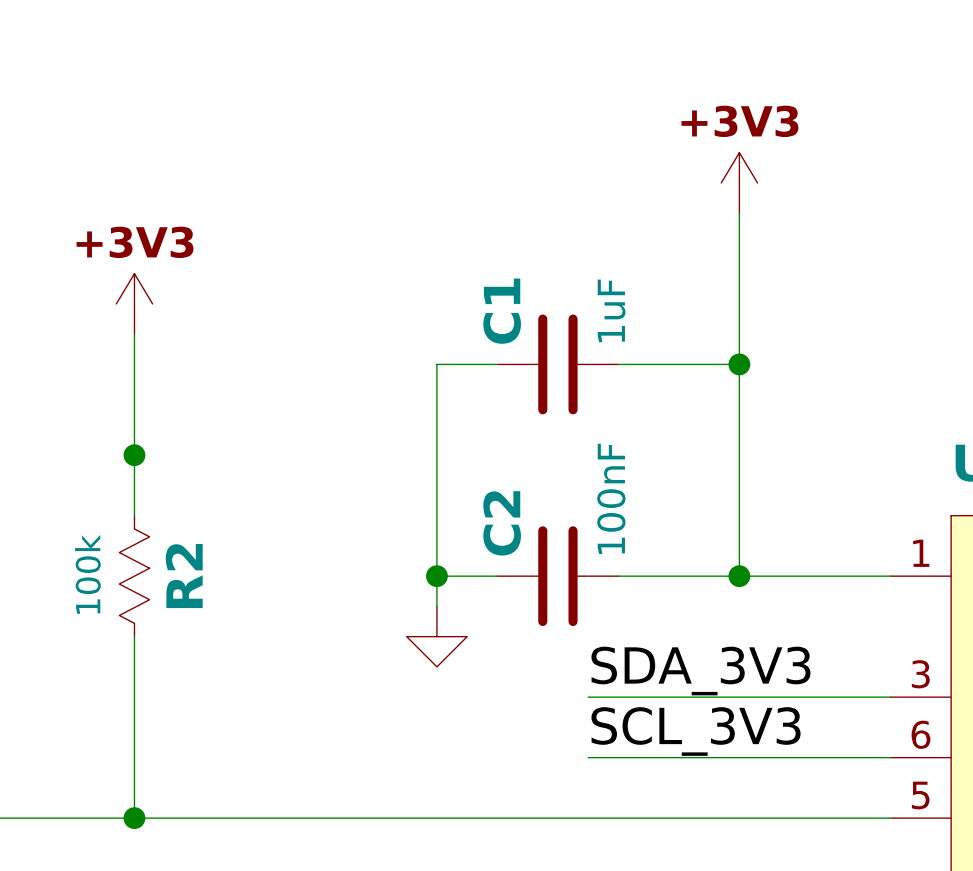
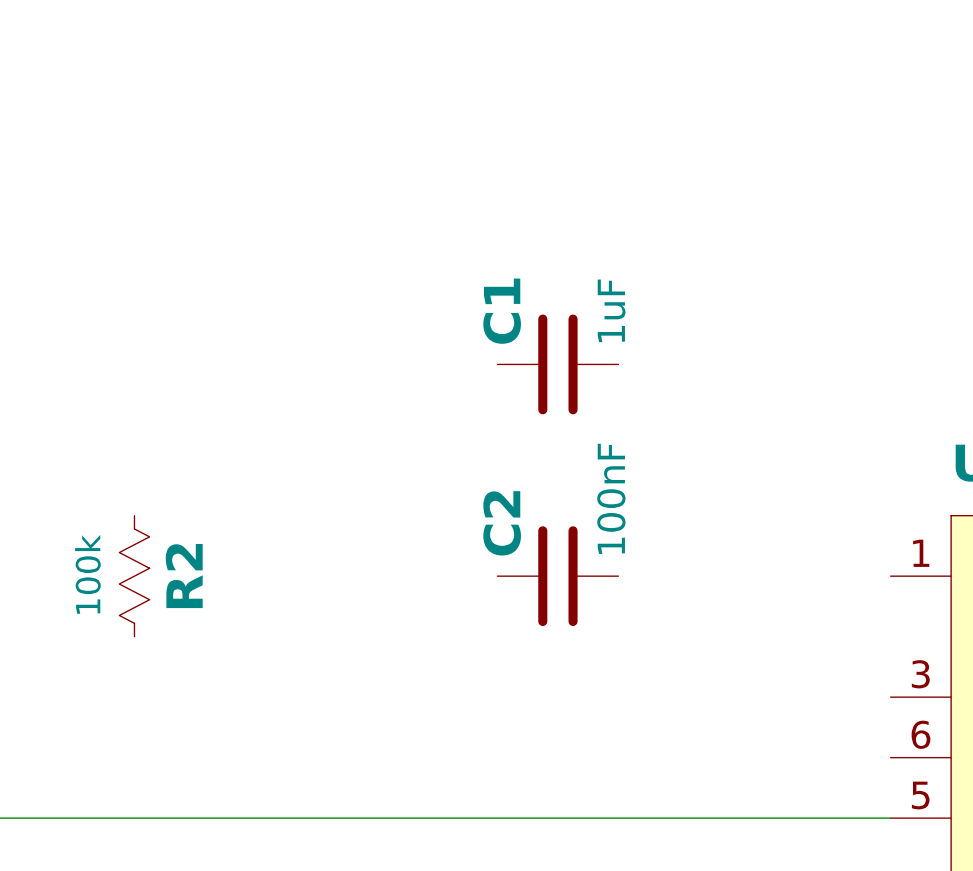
power symbol: (739, 182) -> none
wire: (739, 213) (739, 576) -> none
power symbol: (134, 303) -> none
wire: (134, 334) (134, 515) -> none
wire: (497, 364) (436, 364) (436, 606) -> none
wire: (618, 364) (739, 364) -> none
junction: (739, 364) -> none
junction: (134, 455) -> none
wire: (436, 576) (497, 576) -> none
junction: (436, 576) -> none
wire: (618, 576) (890, 576) -> none
junction: (739, 576) -> none
wire: (134, 636) (134, 818) -> none
power symbol: (436, 636) -> none
label: SDA_3V3 (700, 671) -> none
wire: (588, 697) (890, 697) -> none
label: SCL_3V3 (696, 731) -> none
wire: (588, 757) (890, 757) -> none
junction: (134, 818) -> none

